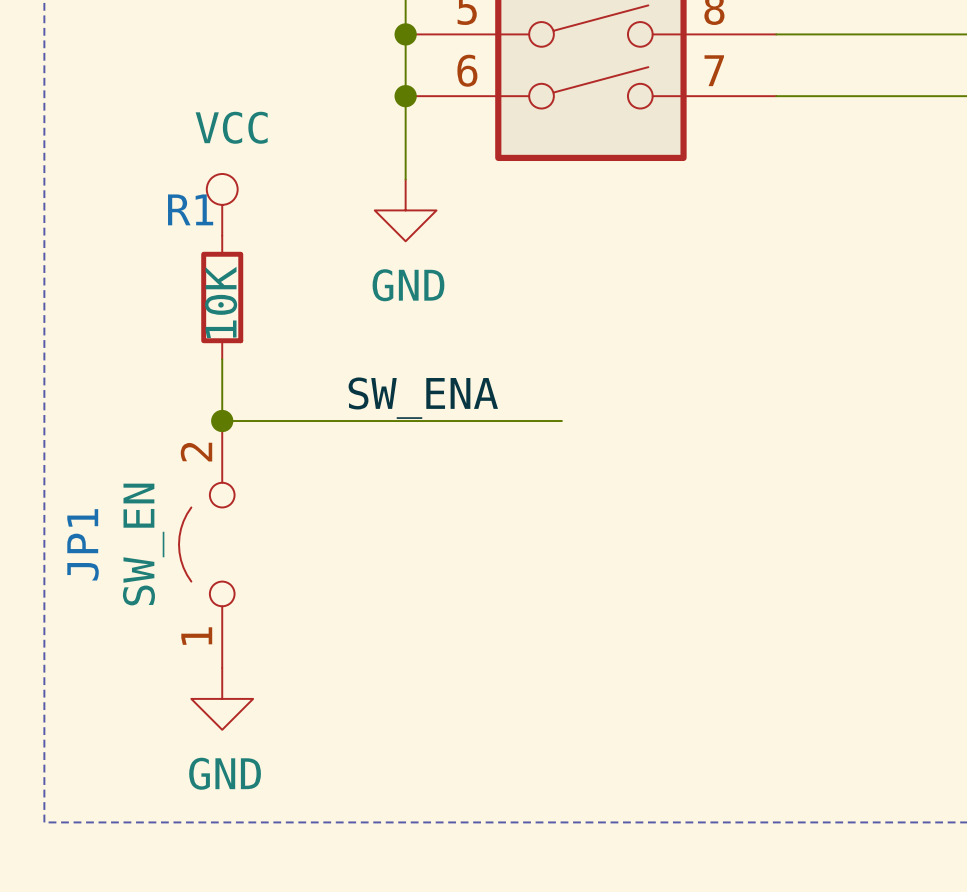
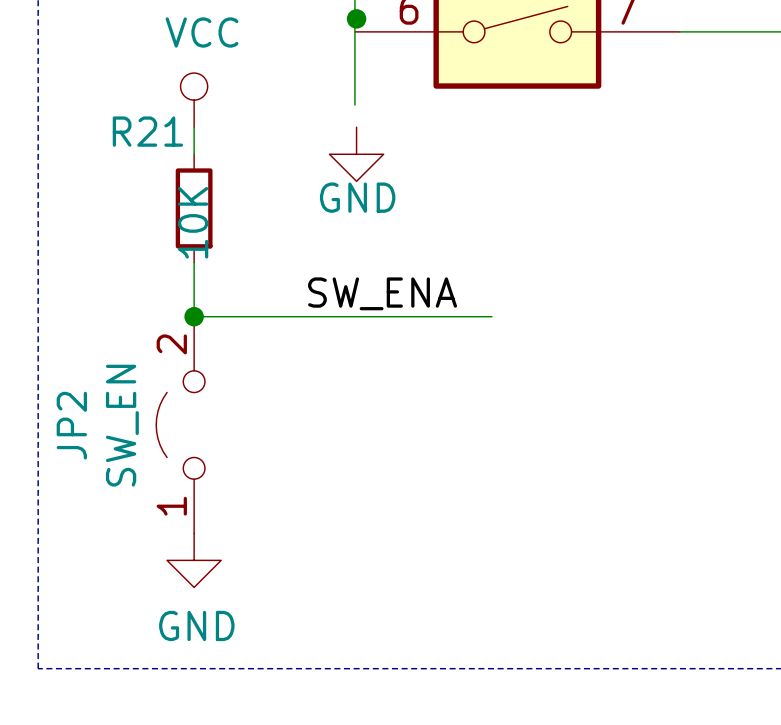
junction position: (405, 96) -> (356, 18)
power symbol position: VCC (222, 204) -> VCC (194, 100)
R1 name: R1 (190, 209) -> R21 (147, 131)
power symbol position: GND (405, 210) -> GND (356, 154)
JP1 name: JP1 (83, 544) -> JP2 (71, 425)

